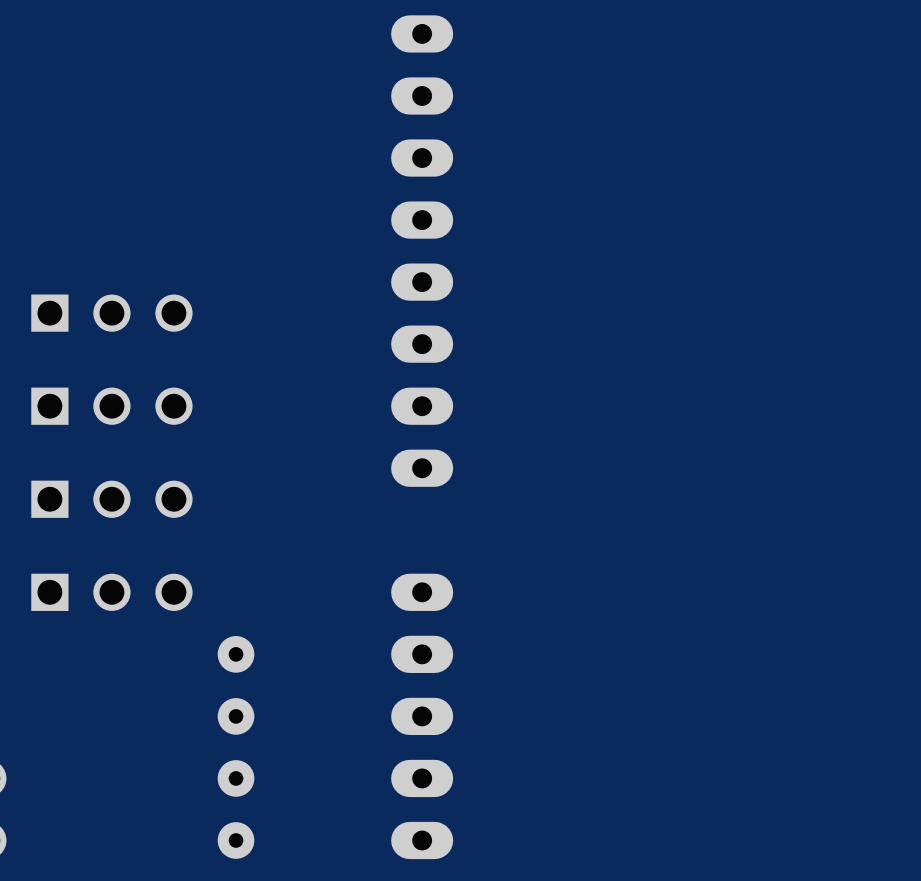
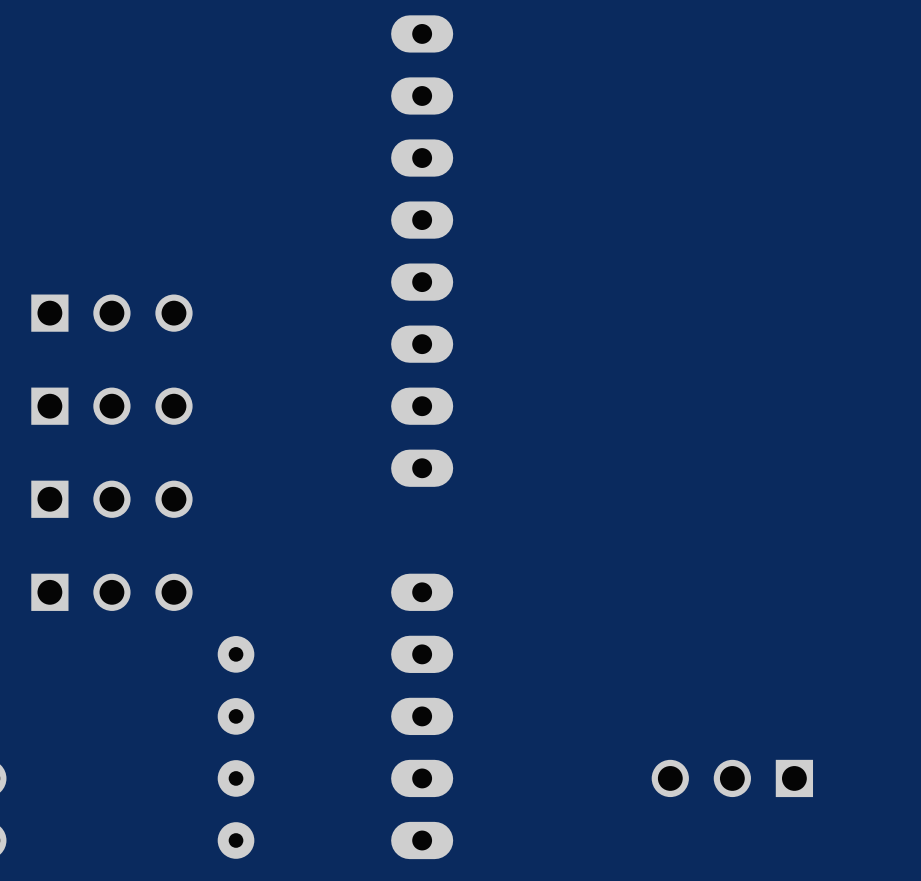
part: none -> (732, 778)

